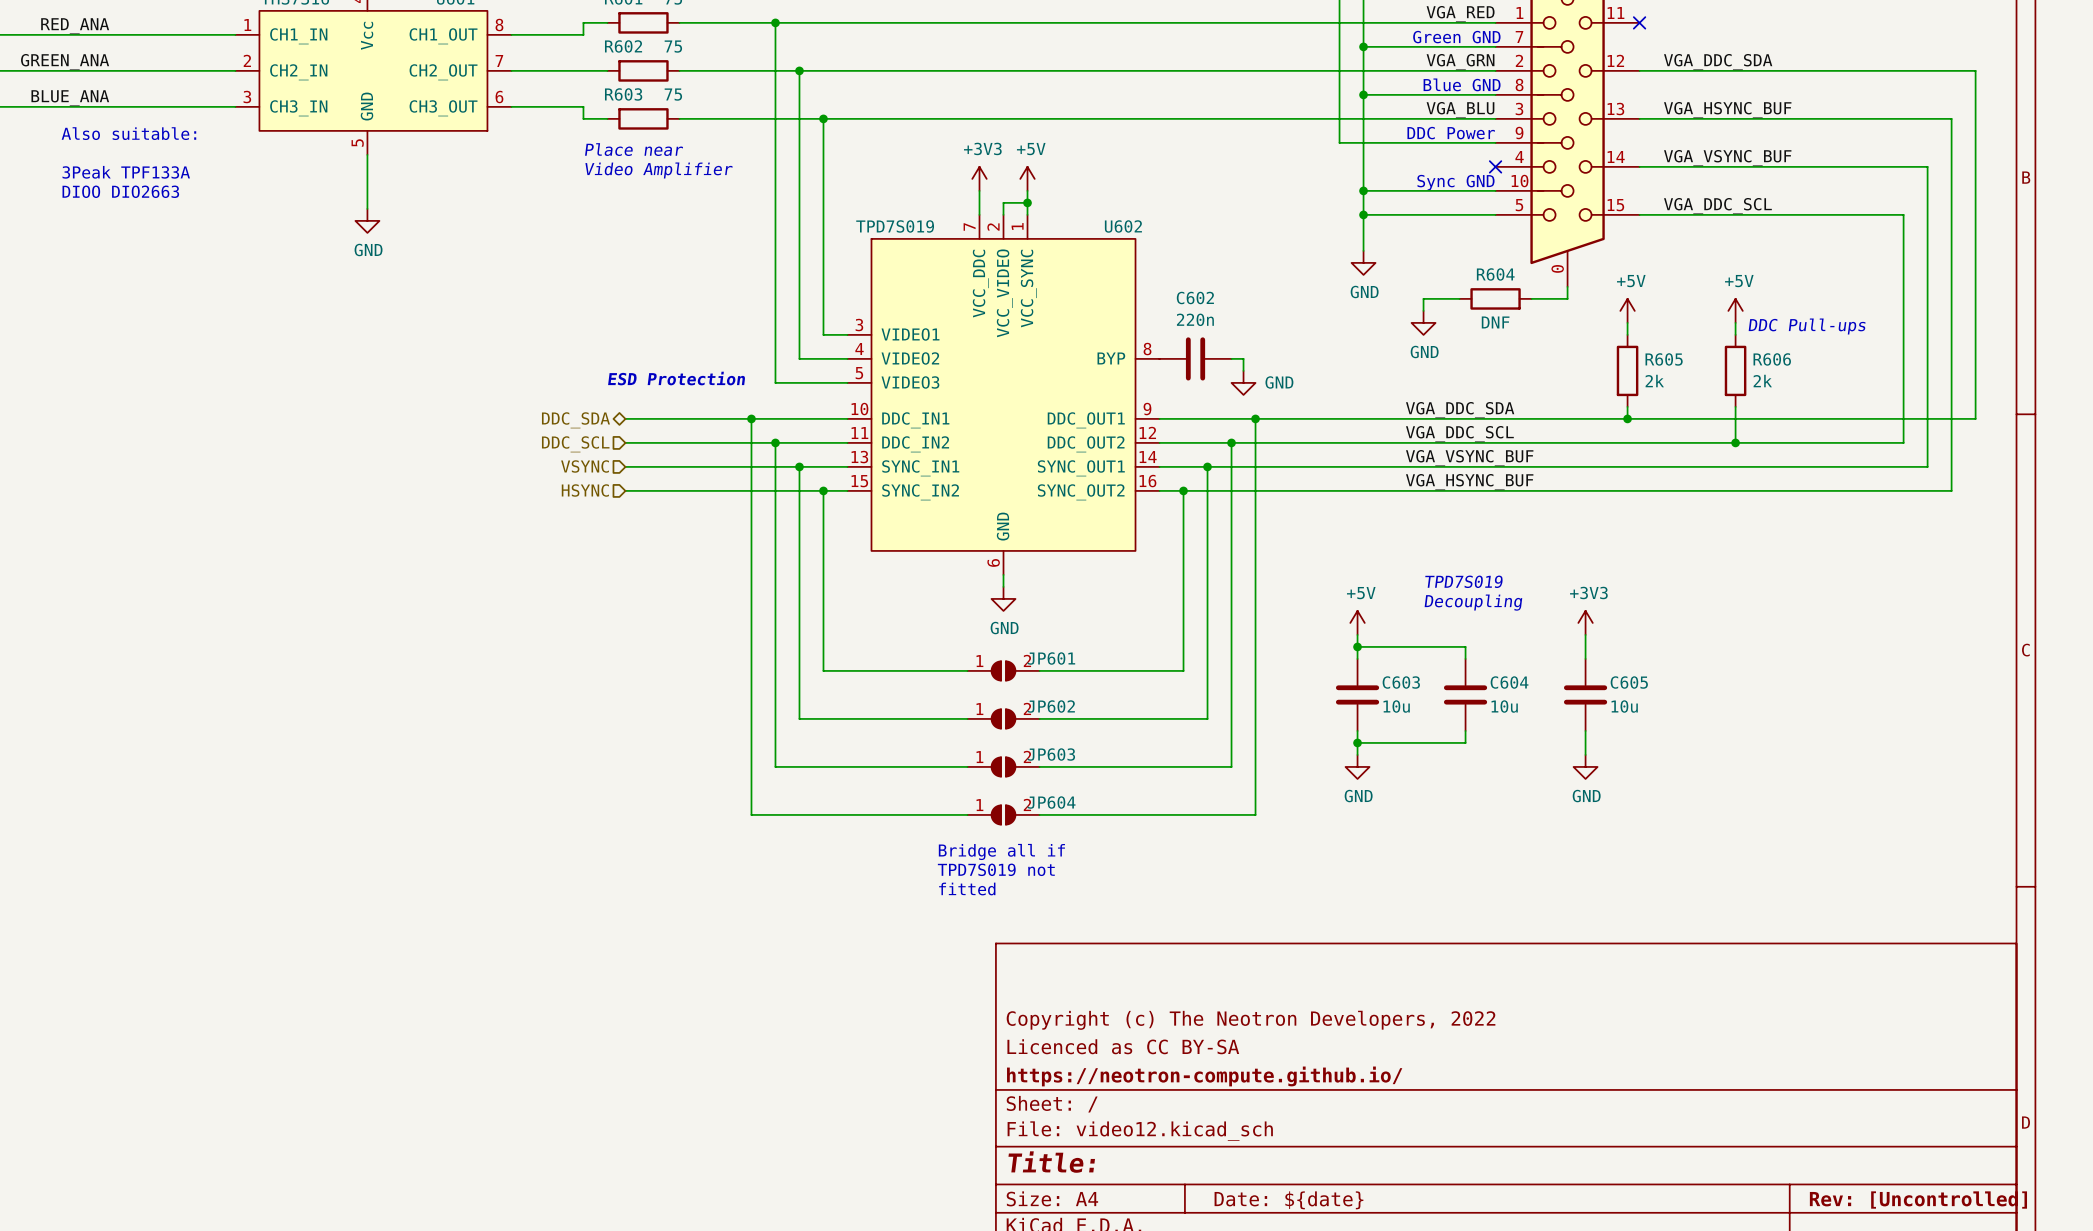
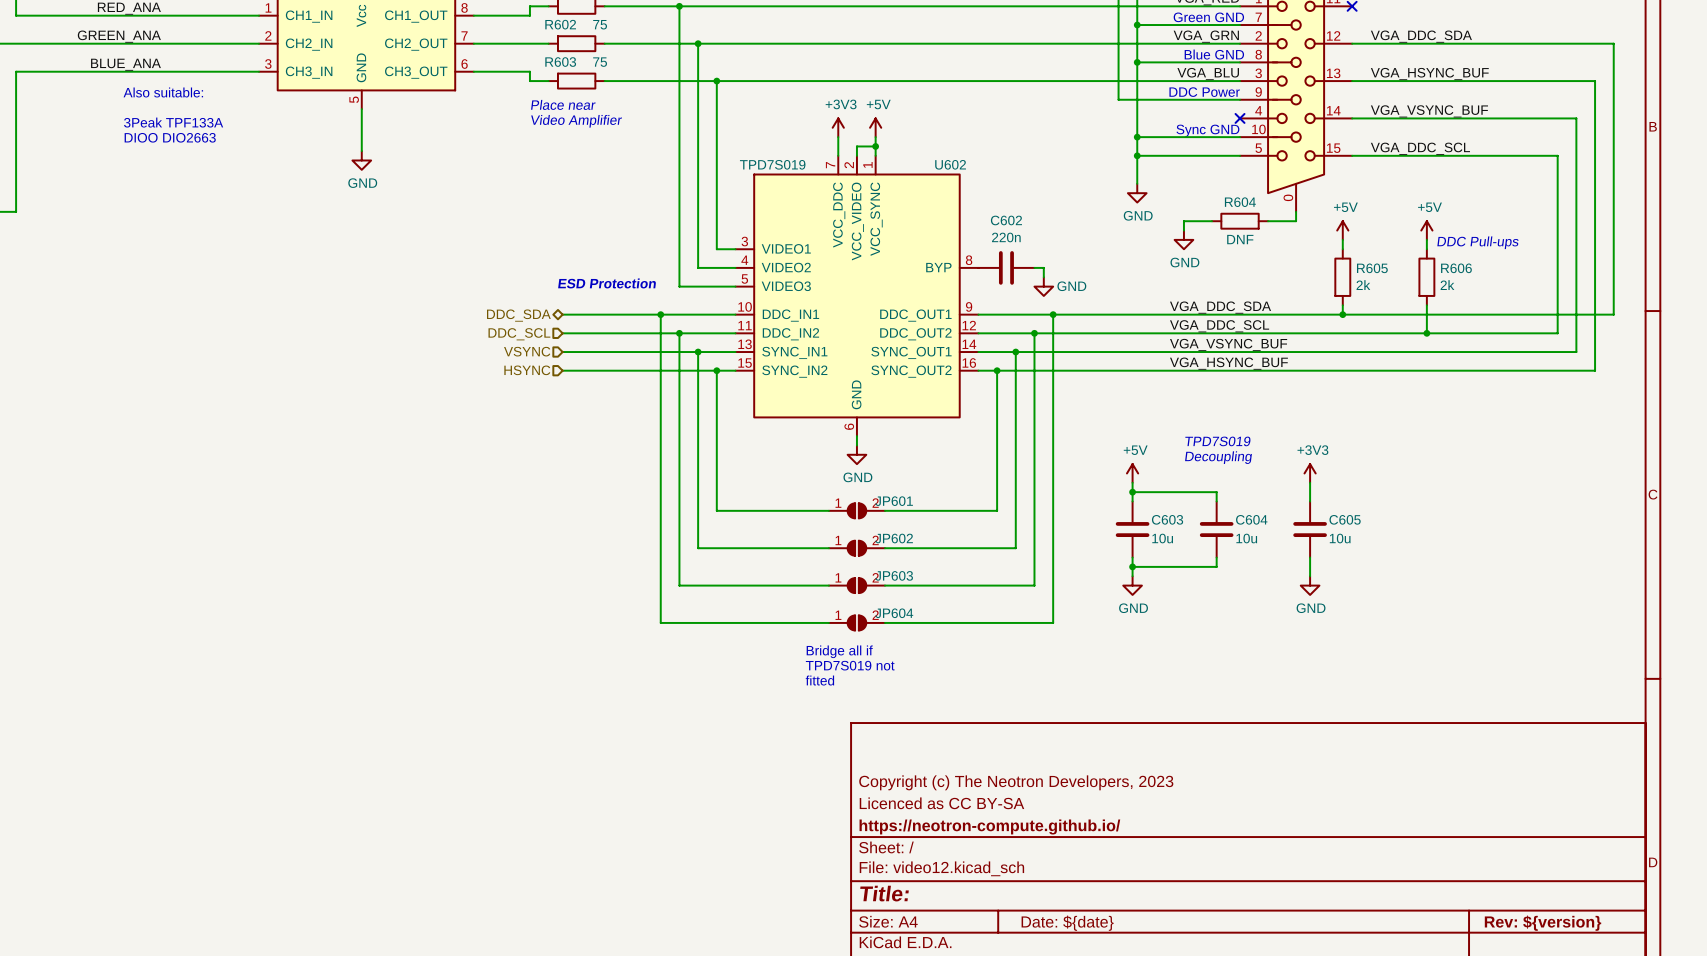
title block: Copyright (c) The Neotron Developers, 2022 (1251, 1020) -> Copyright (c) The Neotron Developers, 2023 (1016, 782)
title block: Rev: [Uncontrolled] (1918, 1200) -> Rev: ${version} (1543, 923)

